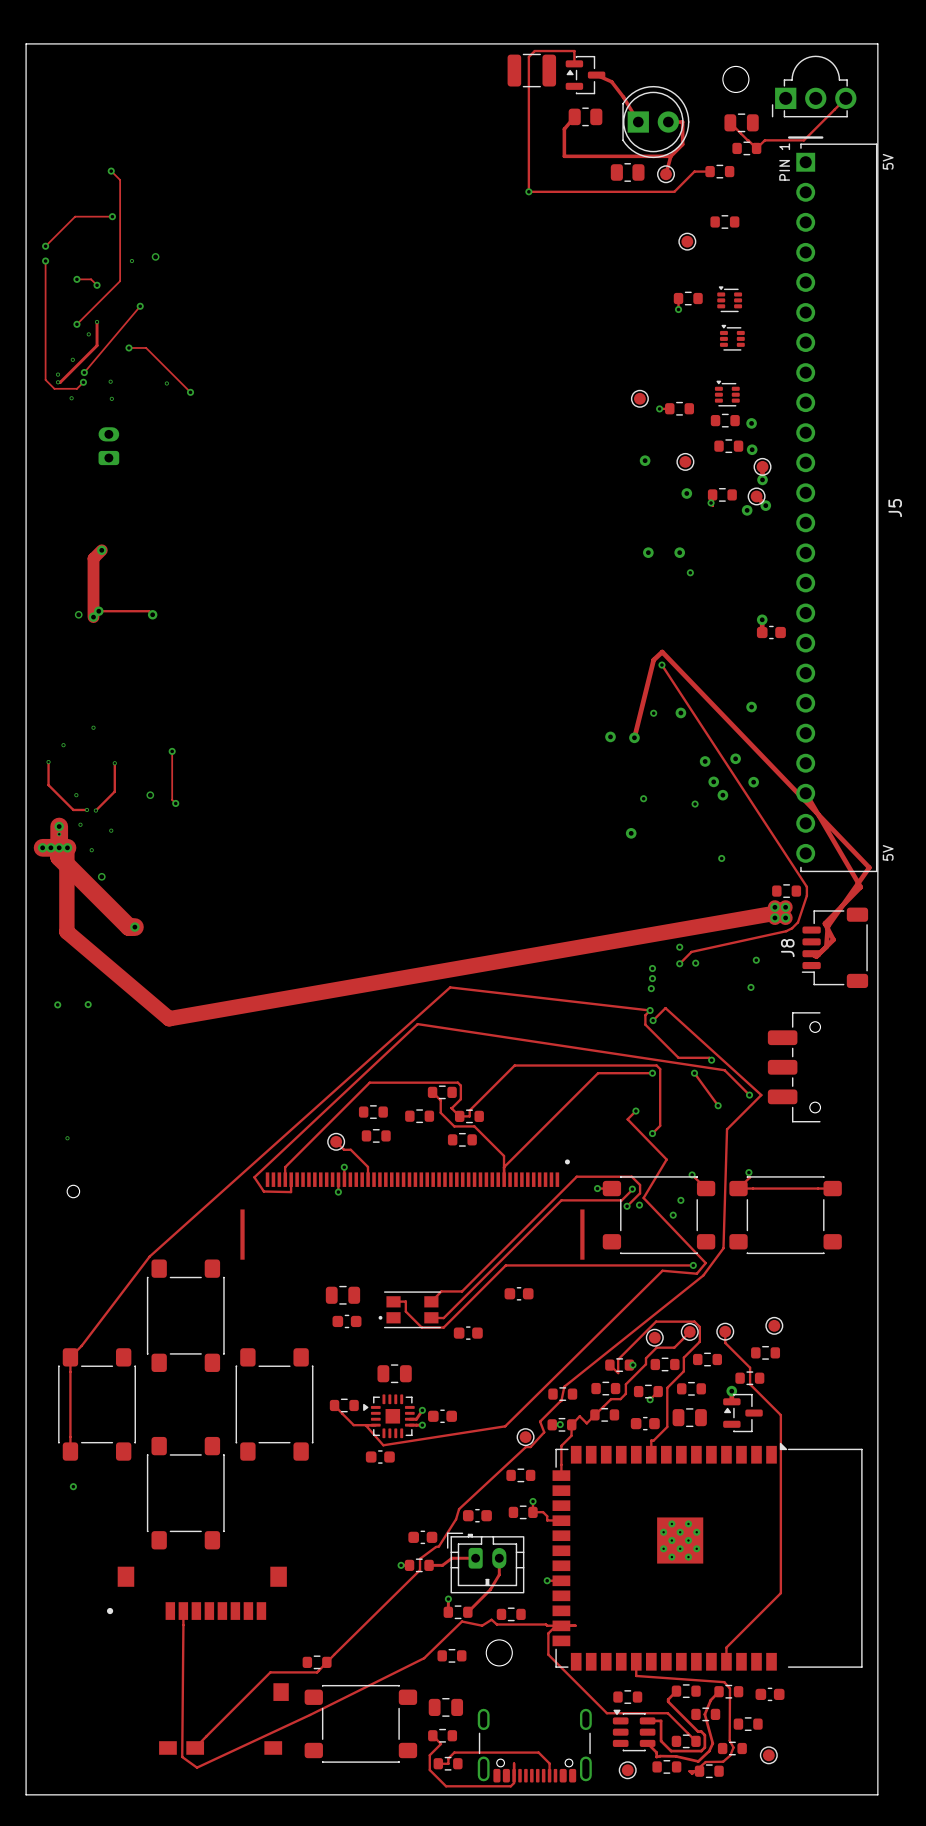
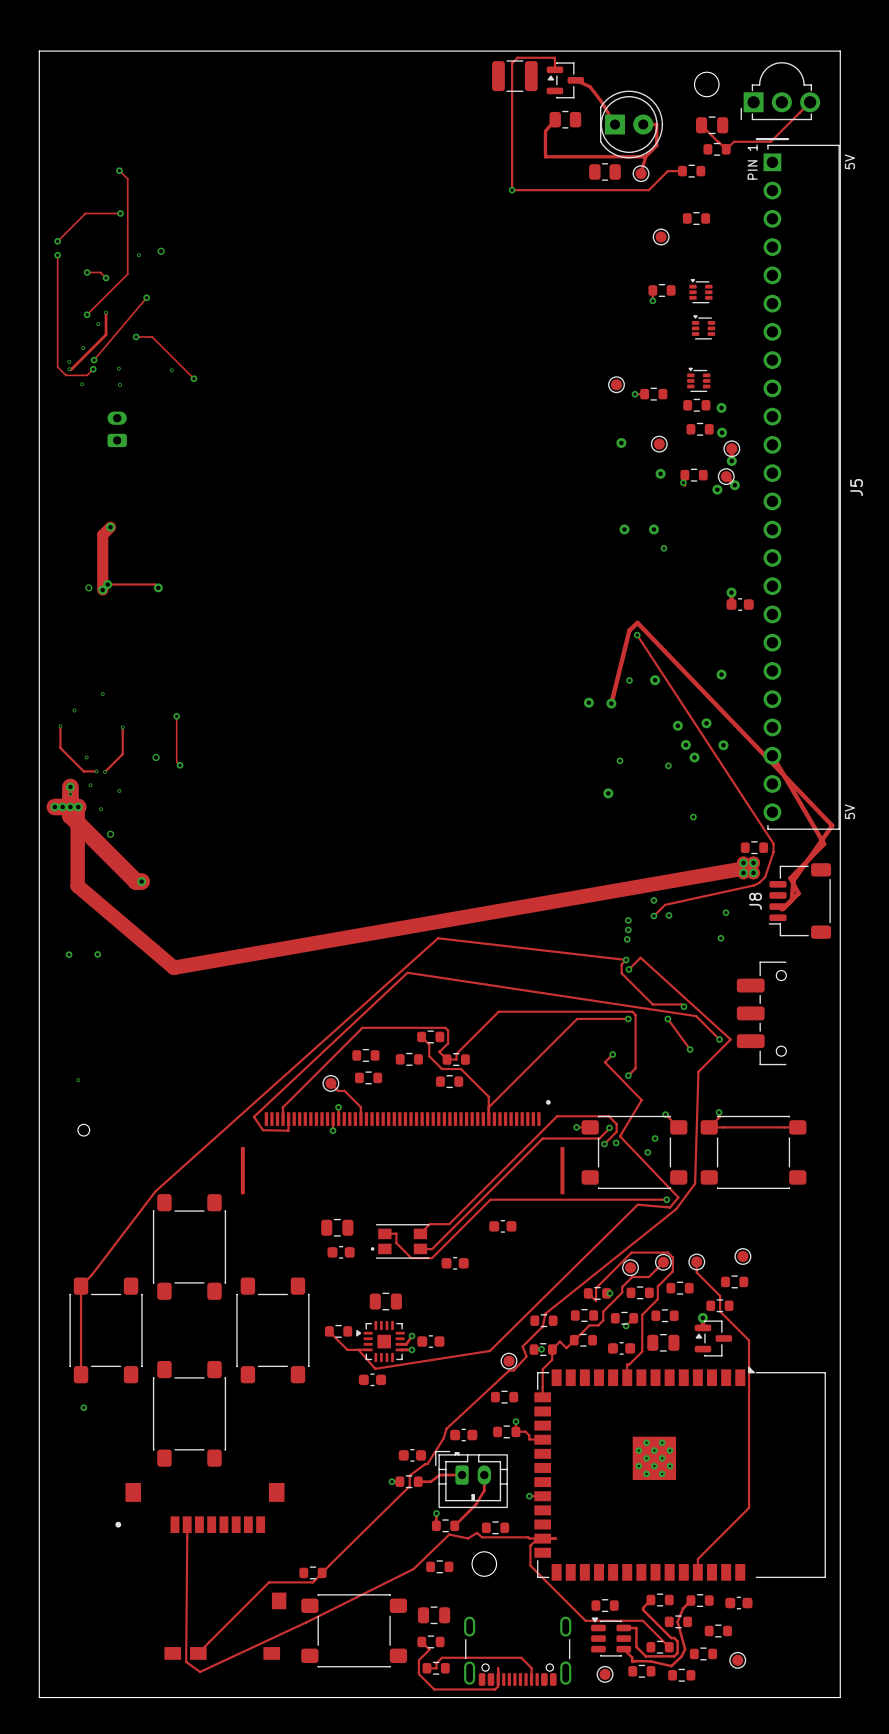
track: (636, 1661) (636, 1675) (724, 1682) (729, 1688) (729, 1740) (733, 1747) (730, 1755) (723, 1761) (705, 1762) (692, 1773) (689, 1771) (699, 1771) -> none

